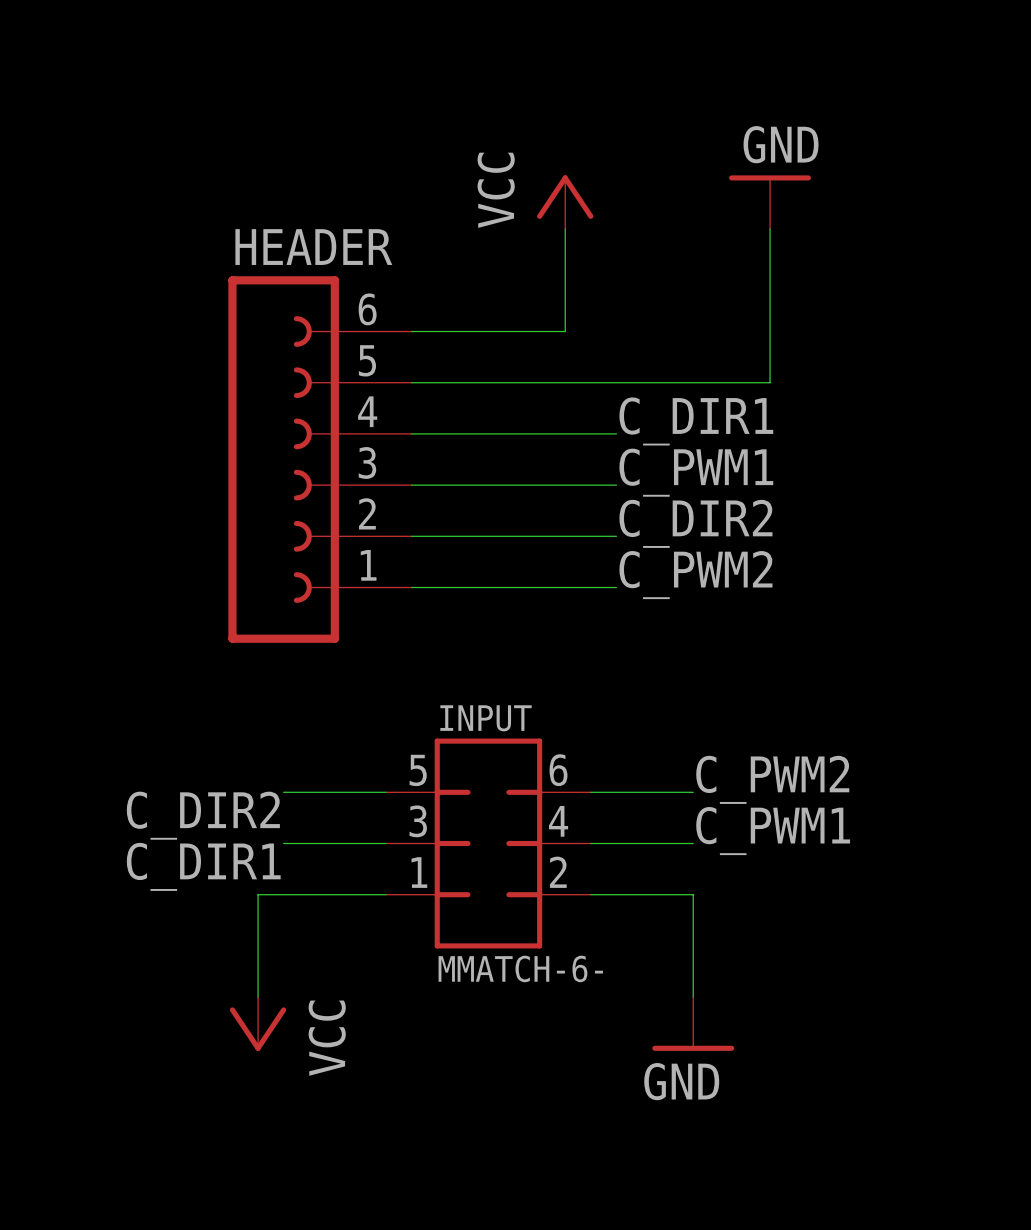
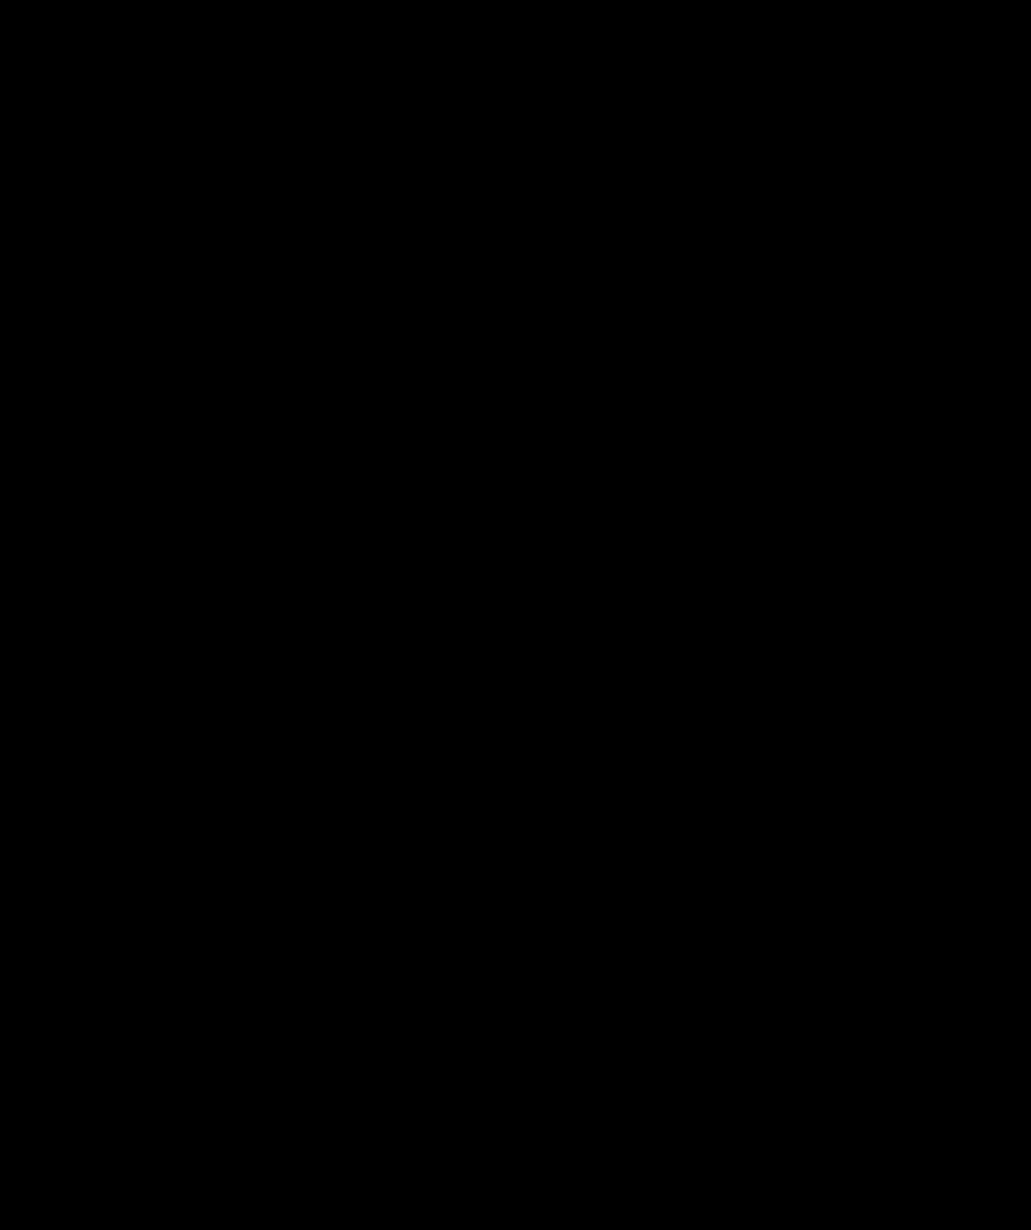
power symbol: VCC (565, 202) -> none
power symbol: GND (770, 202) -> none
wire: (565, 229) (565, 331) (411, 331) -> none
wire: (770, 229) (770, 382) (411, 382) -> none
label: C_DIR1 (696, 421) -> none
wire: (411, 433) (616, 433) -> none
HEADER: (320, 459) -> none
label: C_PWM1 (696, 472) -> none
wire: (411, 485) (616, 485) -> none
label: C_DIR2 (695, 523) -> none
wire: (411, 536) (616, 536) -> none
label: C_PWM2 (695, 575) -> none
wire: (411, 587) (616, 587) -> none
label: C_PWM2 (772, 779) -> none
wire: (283, 792) (386, 792) -> none
wire: (590, 792) (693, 792) -> none
label: C_DIR2 (203, 815) -> none
label: C_PWM1 (773, 831) -> none
wire: (283, 843) (386, 843) -> none
INPUT: MMATCH-6- (488, 843) -> none
wire: (590, 843) (693, 843) -> none
label: C_DIR1 (203, 866) -> none
wire: (386, 894) (258, 894) (258, 997) -> none
wire: (590, 894) (693, 894) (693, 997) -> none
power symbol: VCC (258, 1023) -> none
power symbol: GND (693, 1023) -> none

